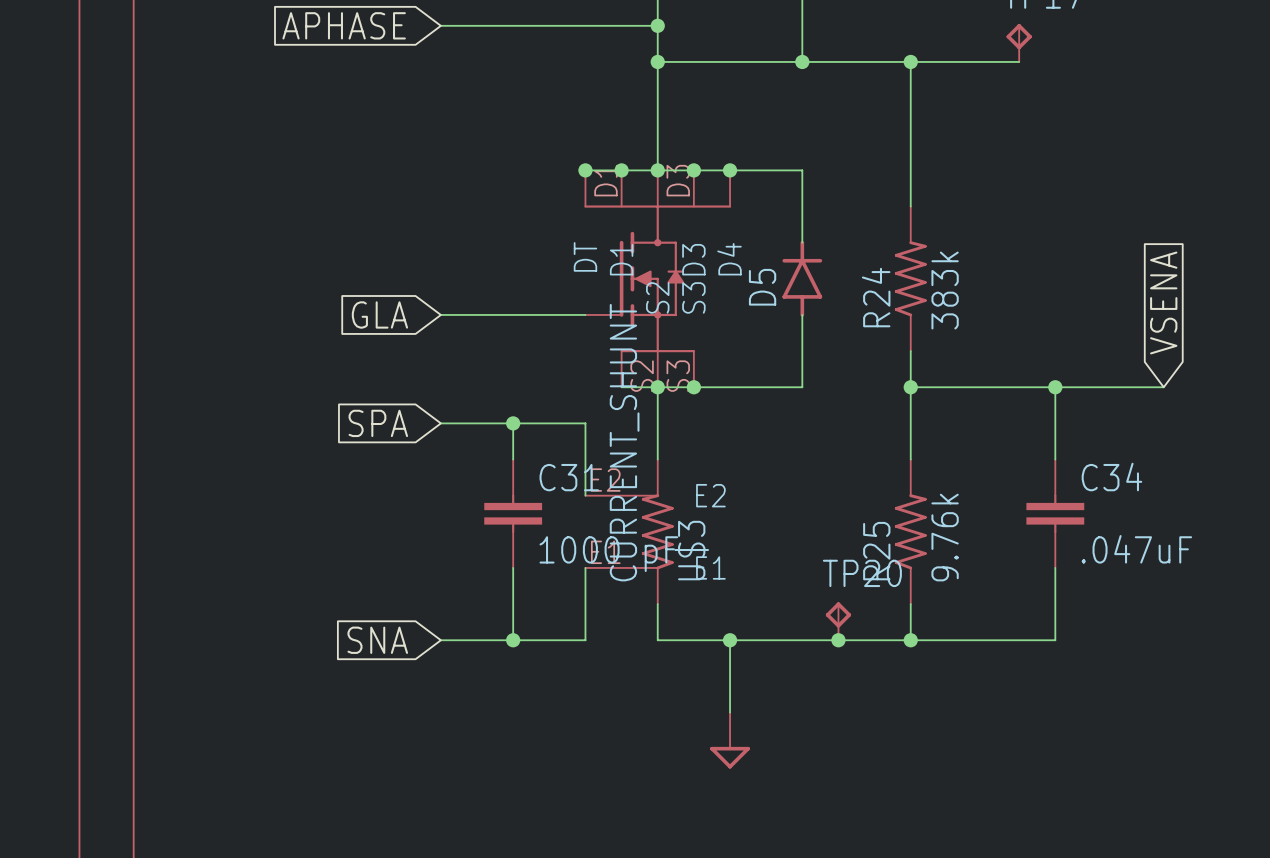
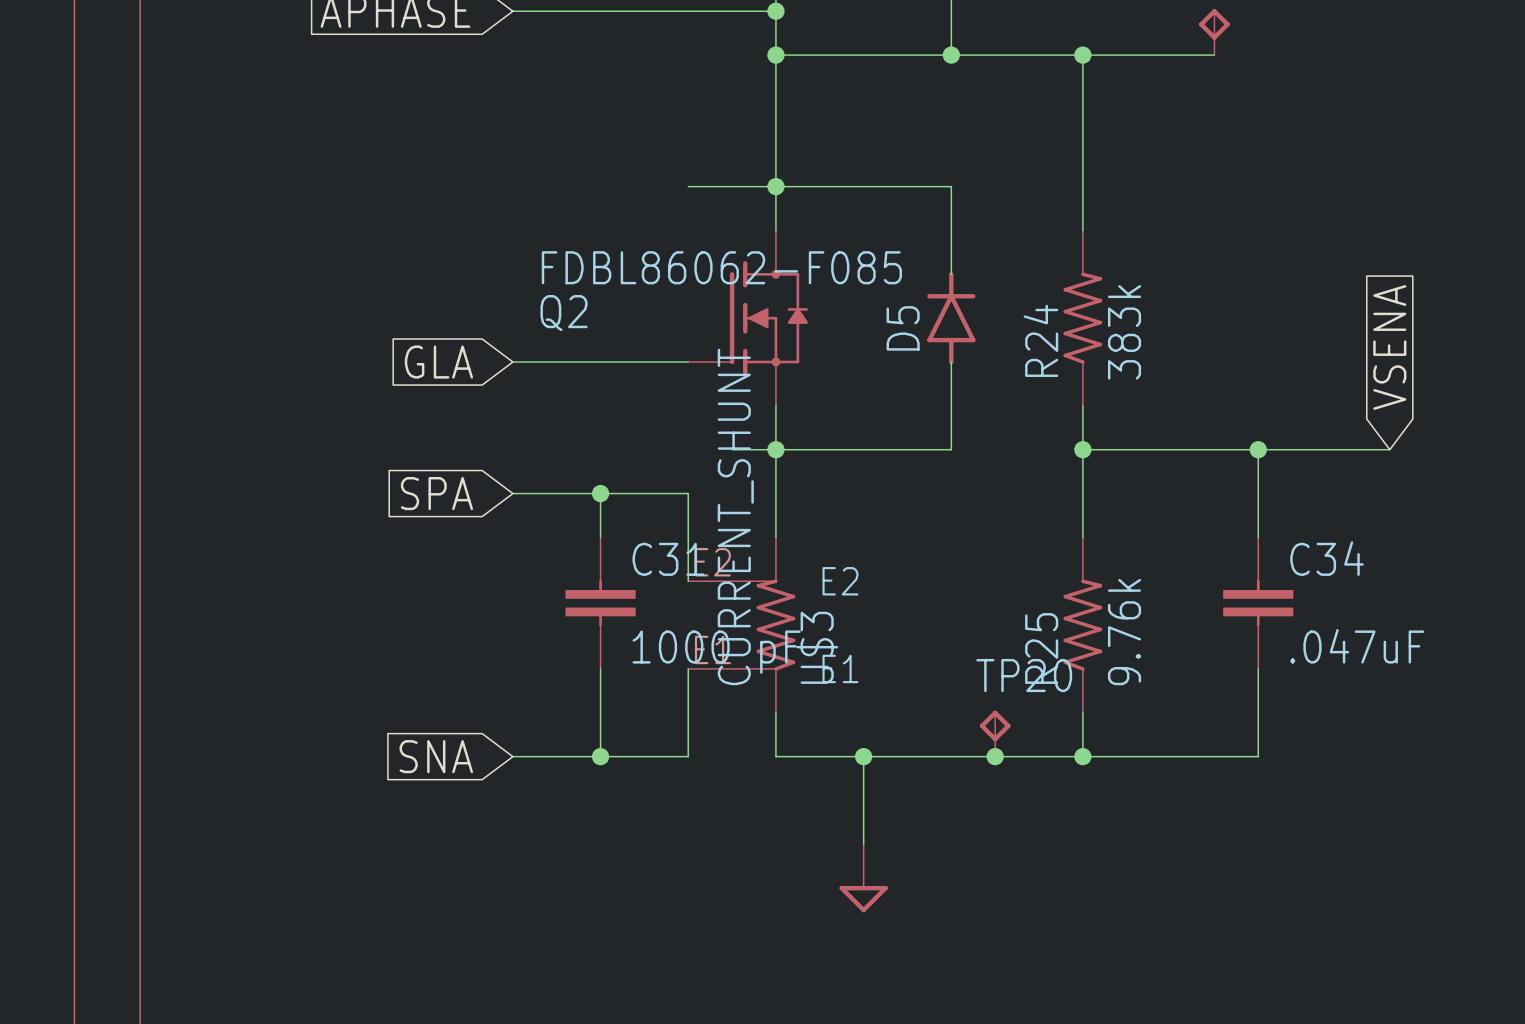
junction: (585, 170) -> none
junction: (621, 170) -> none
junction: (693, 170) -> none
junction: (730, 170) -> none
Q2: none -> FDBL86062-F085 (748, 318)
part: (657, 278) -> none
junction: (693, 387) -> none

